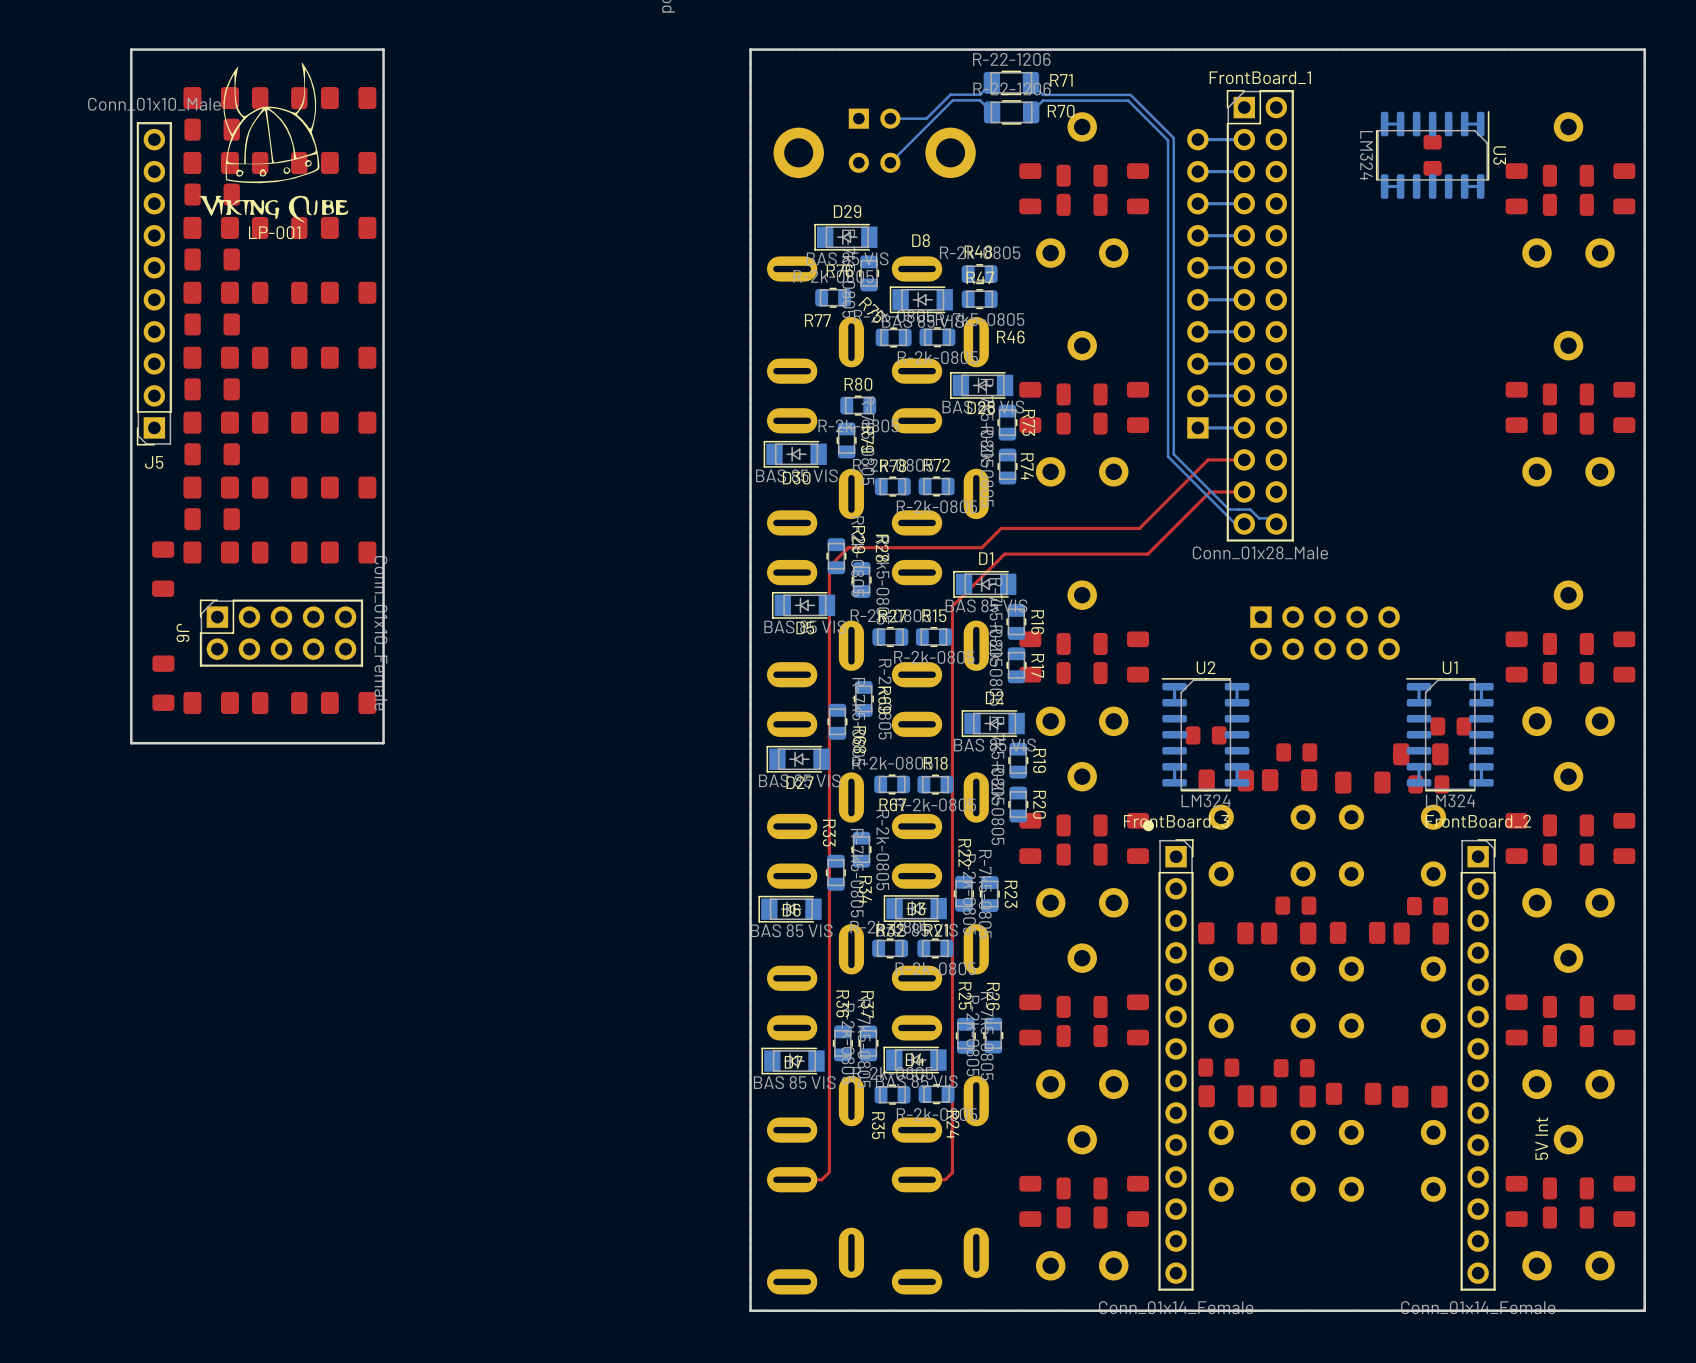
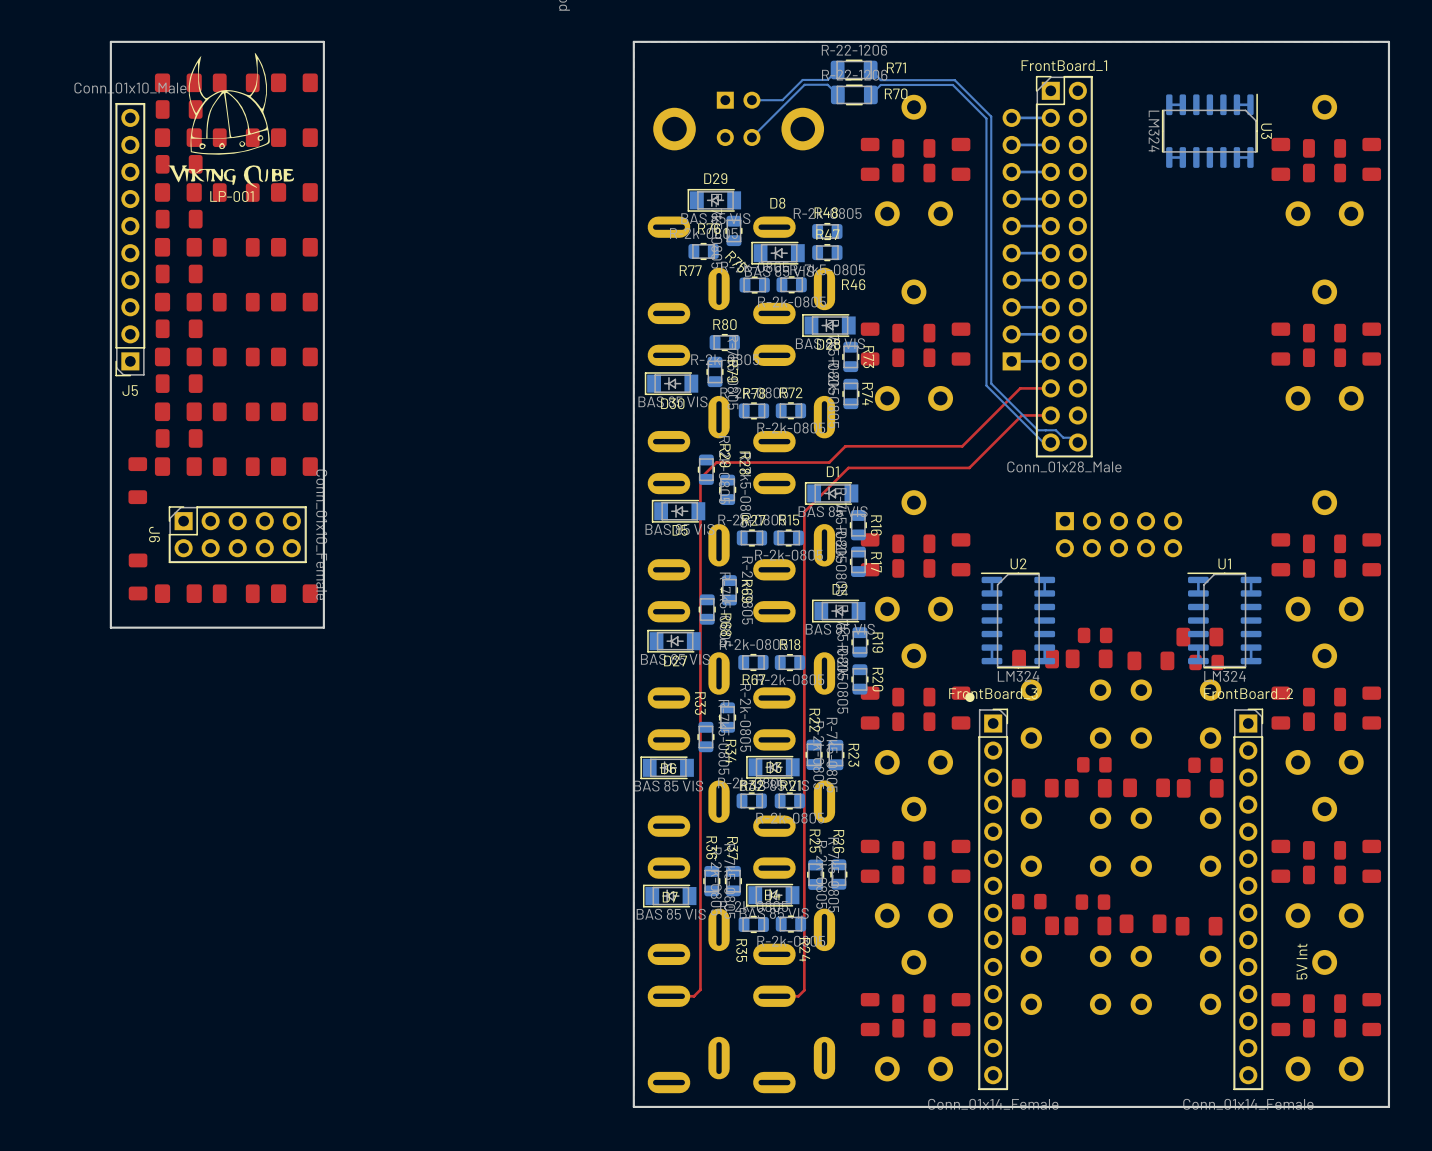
part: (1432, 155) -> none
part: (1450, 726) -> none
part: (1206, 735) -> none

